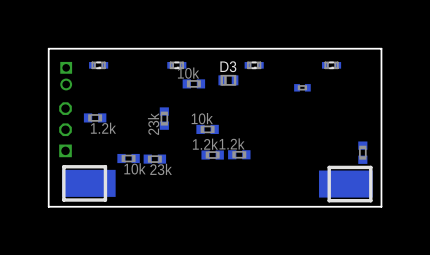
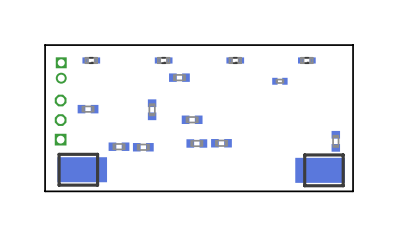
part value: 10k (188, 73) -> none
D3: (228, 80) -> none
part value: 10k (202, 118) -> none
part value: 23k (153, 124) -> none
part value: 1.2k (103, 128) -> none
part value: 1.2k (232, 143) -> none
part value: 1.2k (205, 144) -> none
part value: 10k (134, 168) -> none
part value: 23k (161, 169) -> none

